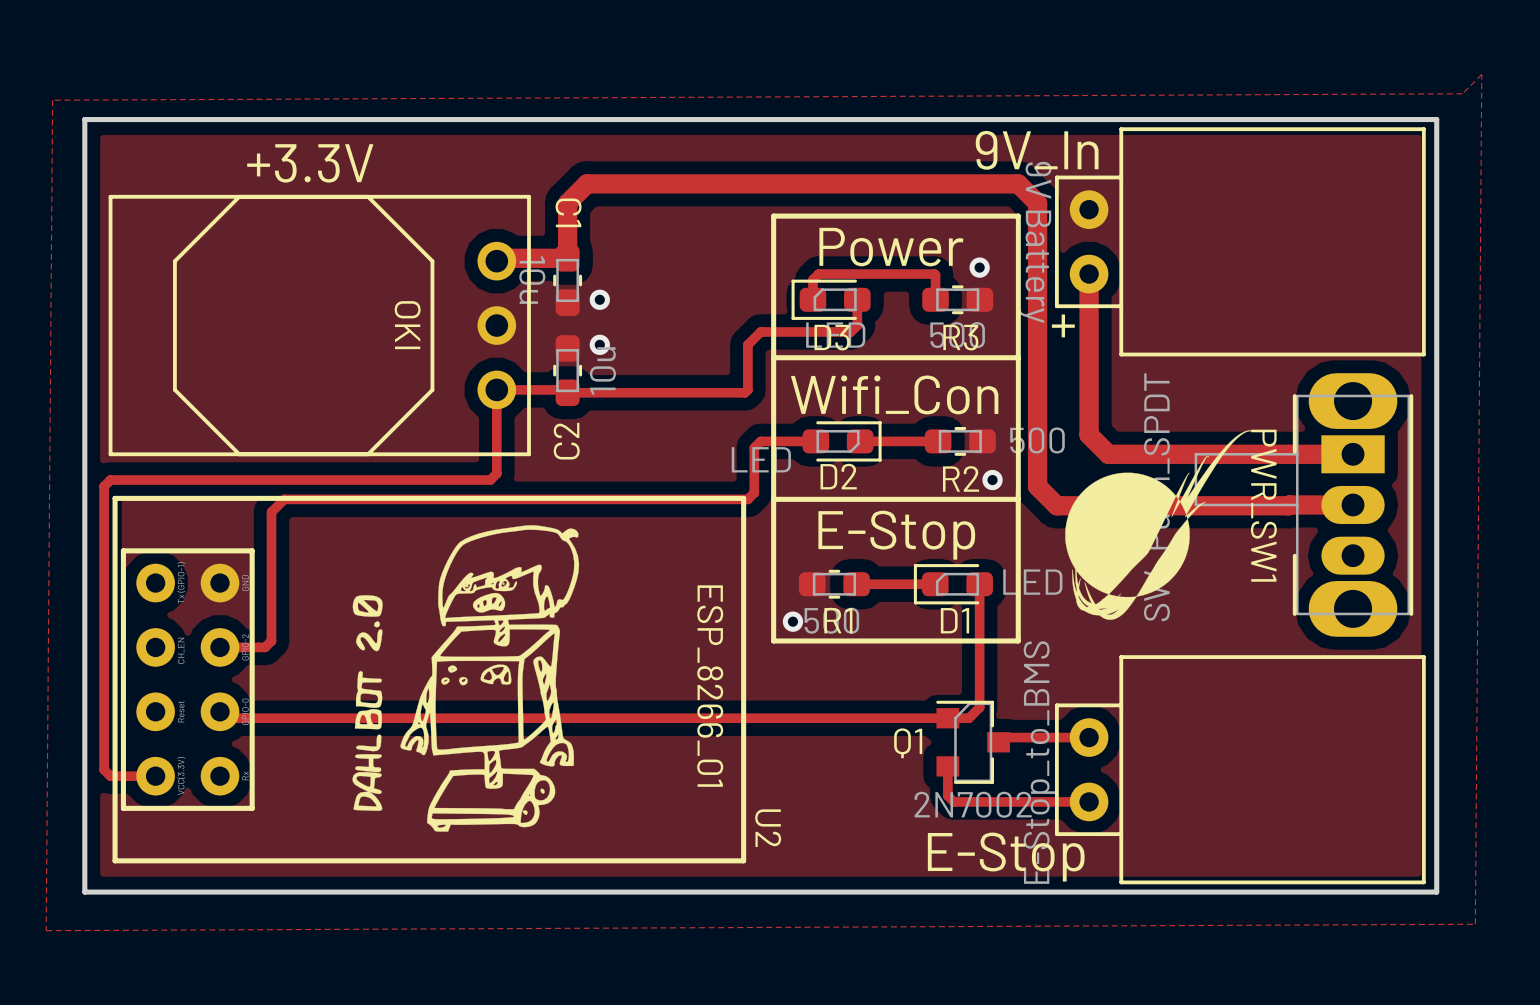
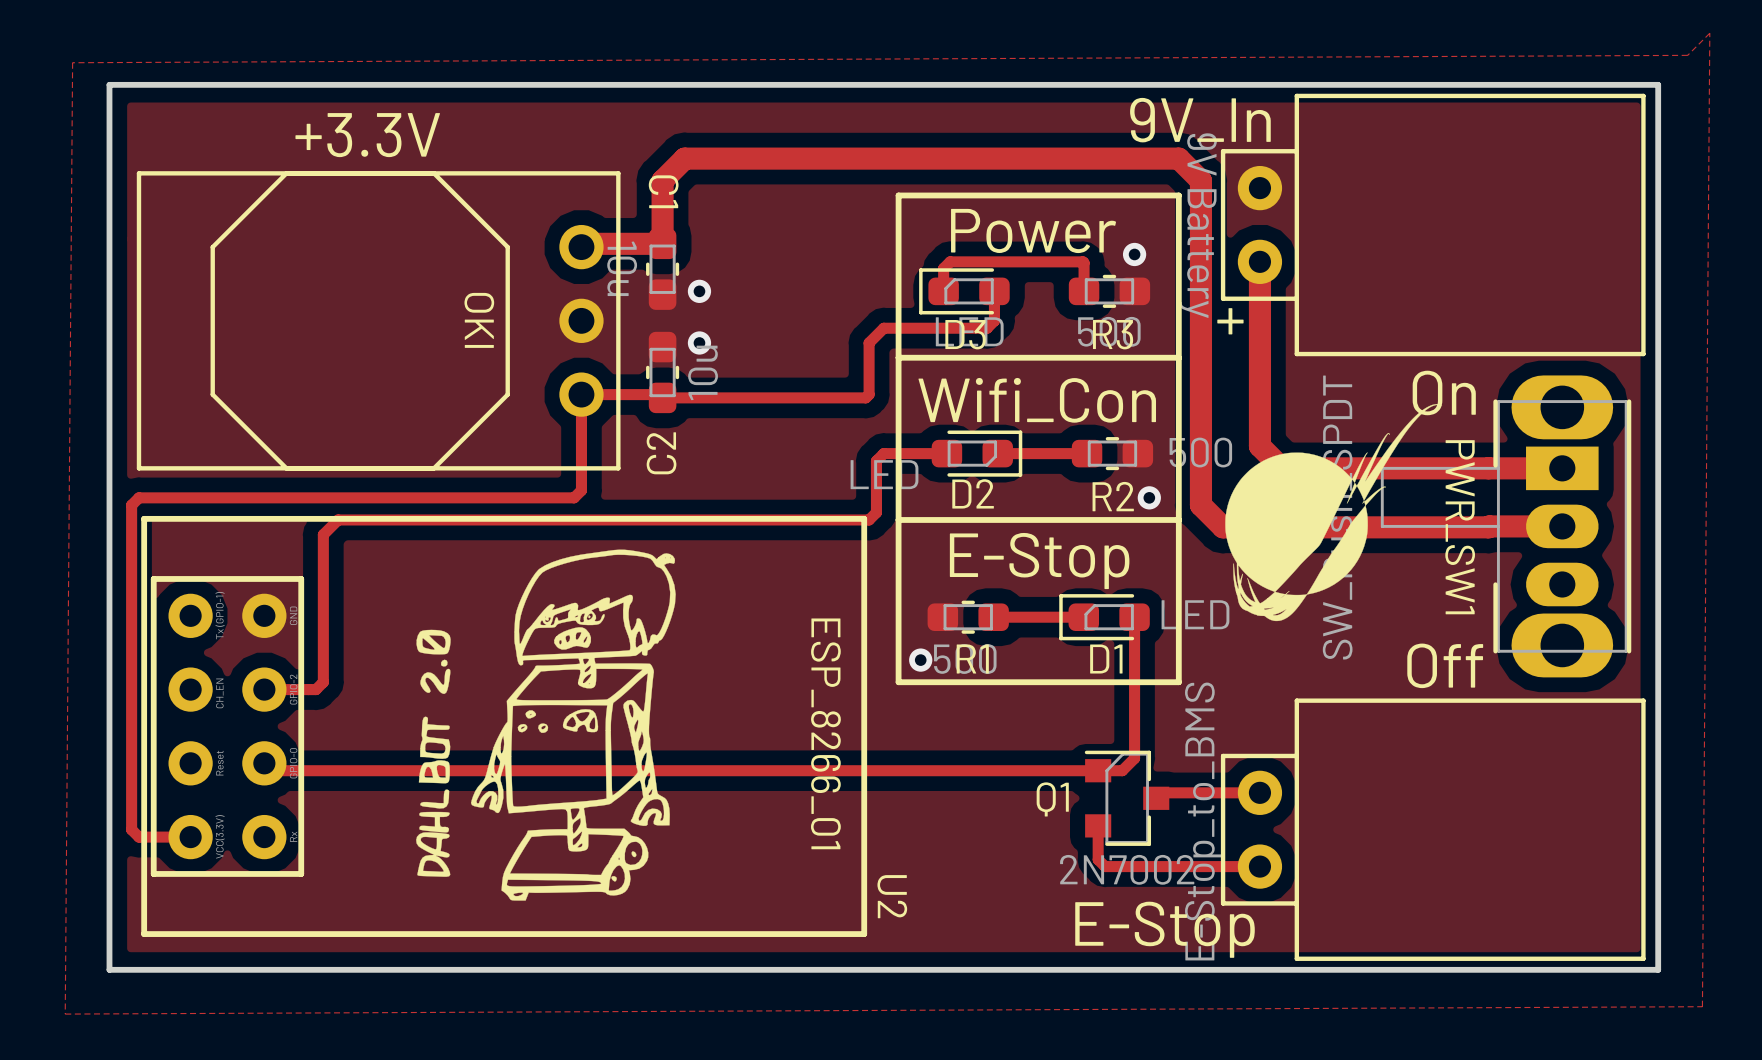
text: none -> On (1444, 392)
drawing position: (1159, 525) -> (1333, 512)
text: none -> Off (1445, 665)

